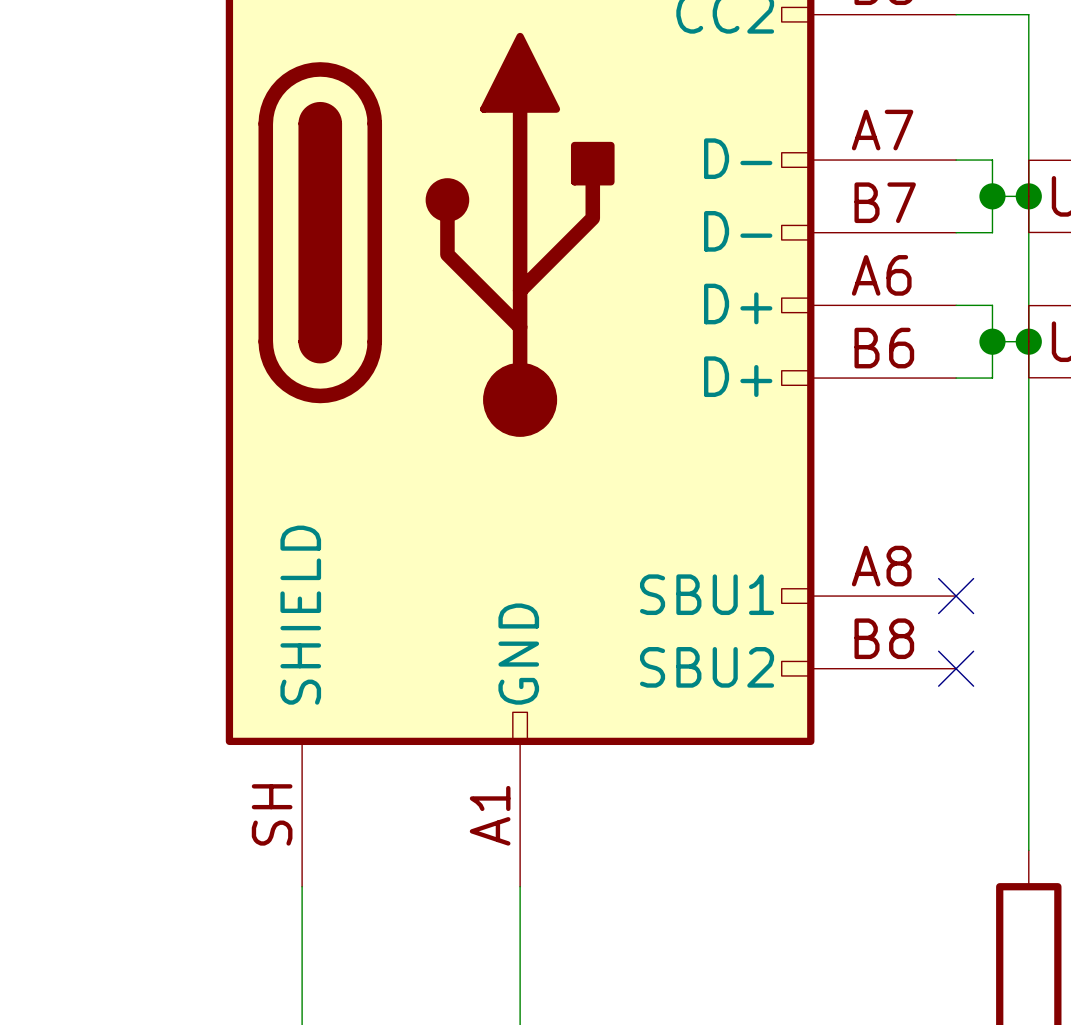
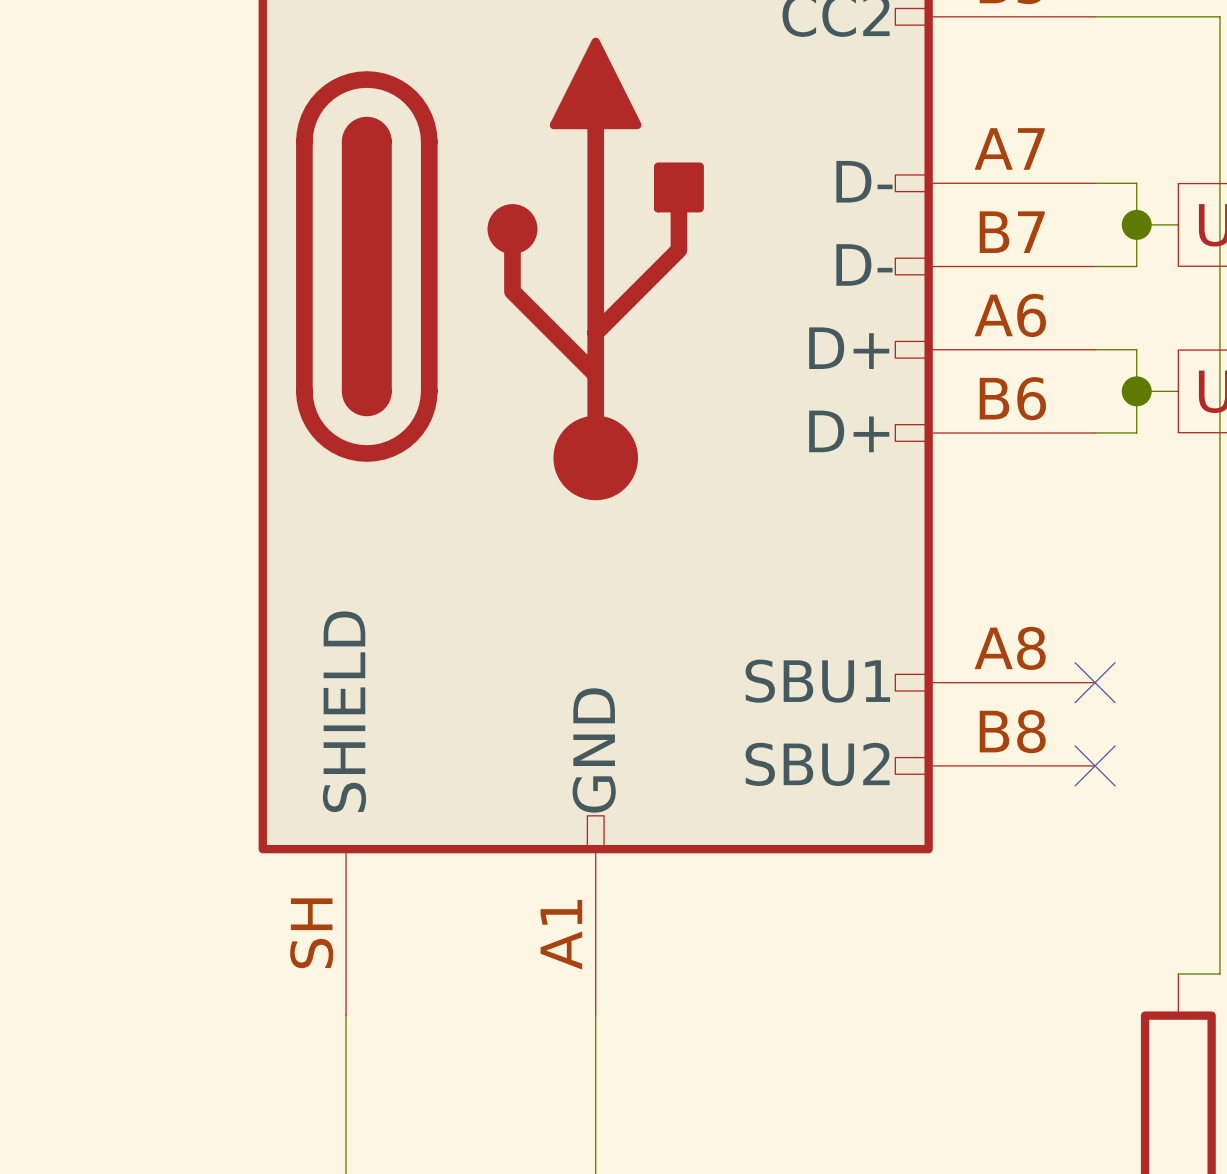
wire: (1028, 14) (1028, 850) -> (1178, 16) (1219, 16) (1219, 973) (1178, 973)
junction: (1028, 196) -> none
junction: (1028, 341) -> none

